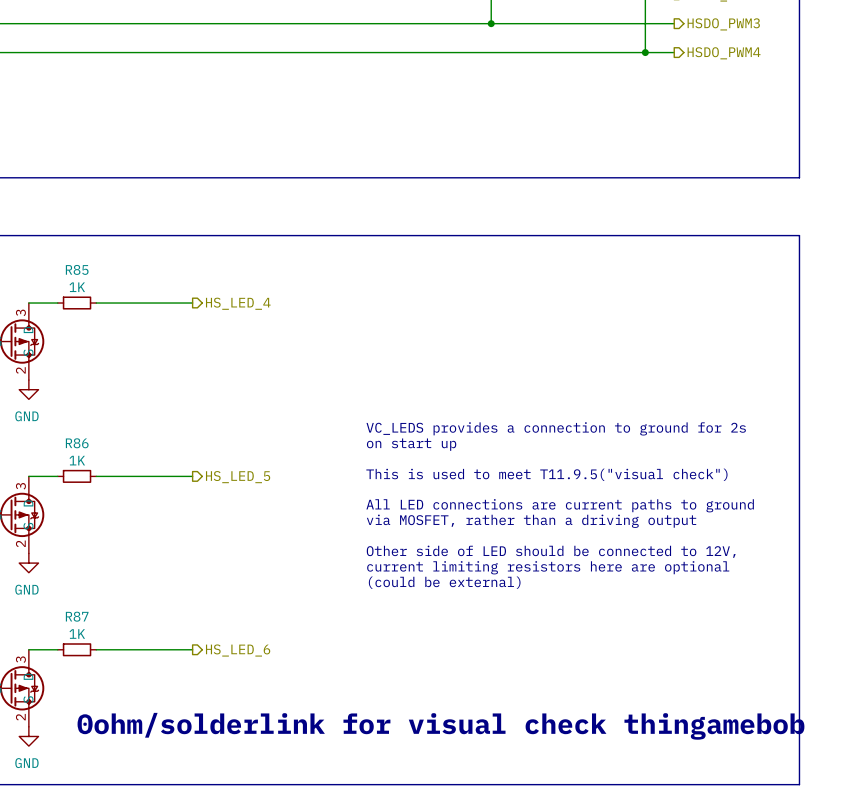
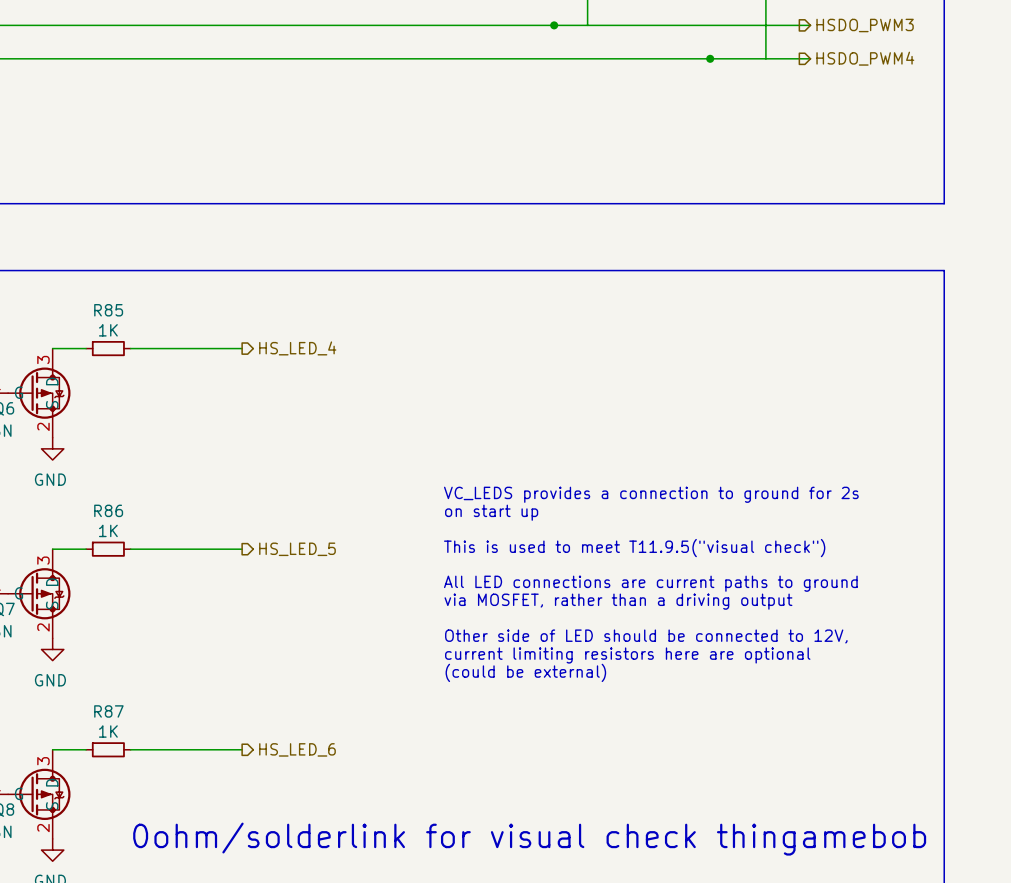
junction position: (491, 23) -> (554, 25)
wire: none -> (799, 25) (810, 25)
junction: none -> (710, 58)
junction: (645, 52) -> none
wire: none -> (799, 58) (810, 58)

